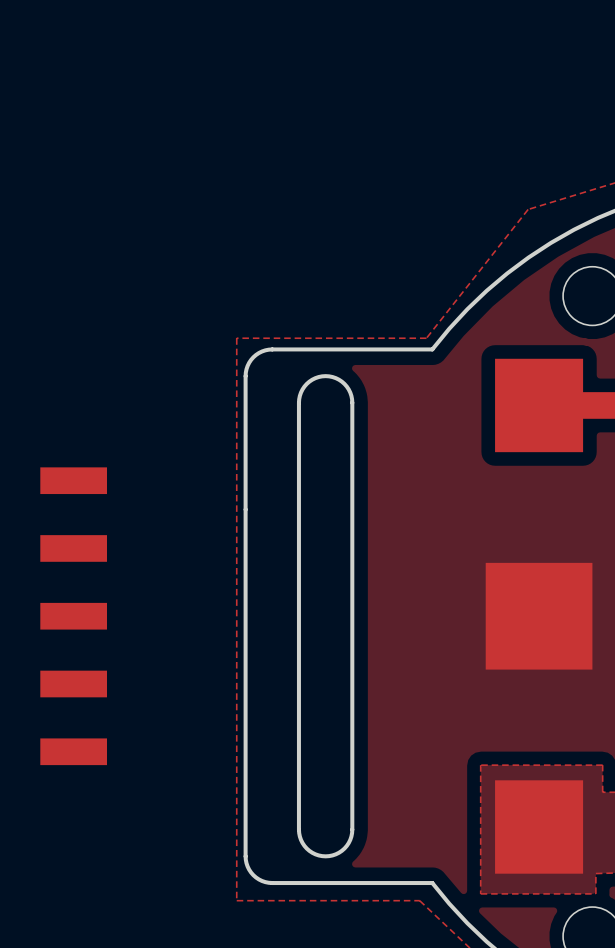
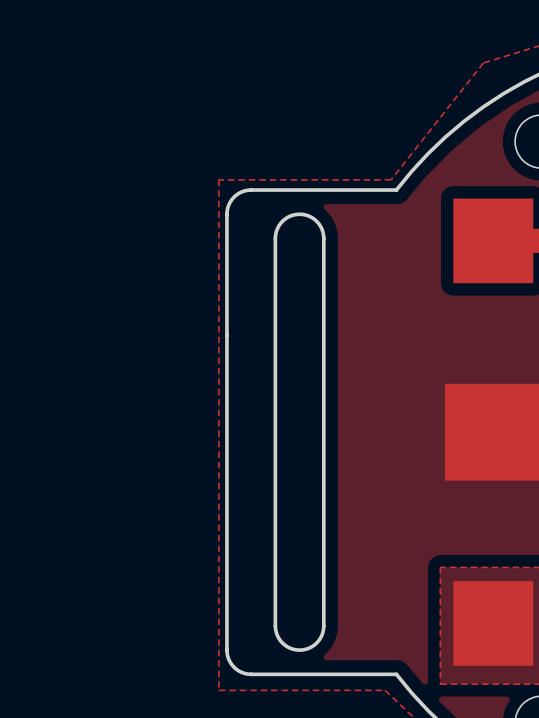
part: (73, 616) -> none

